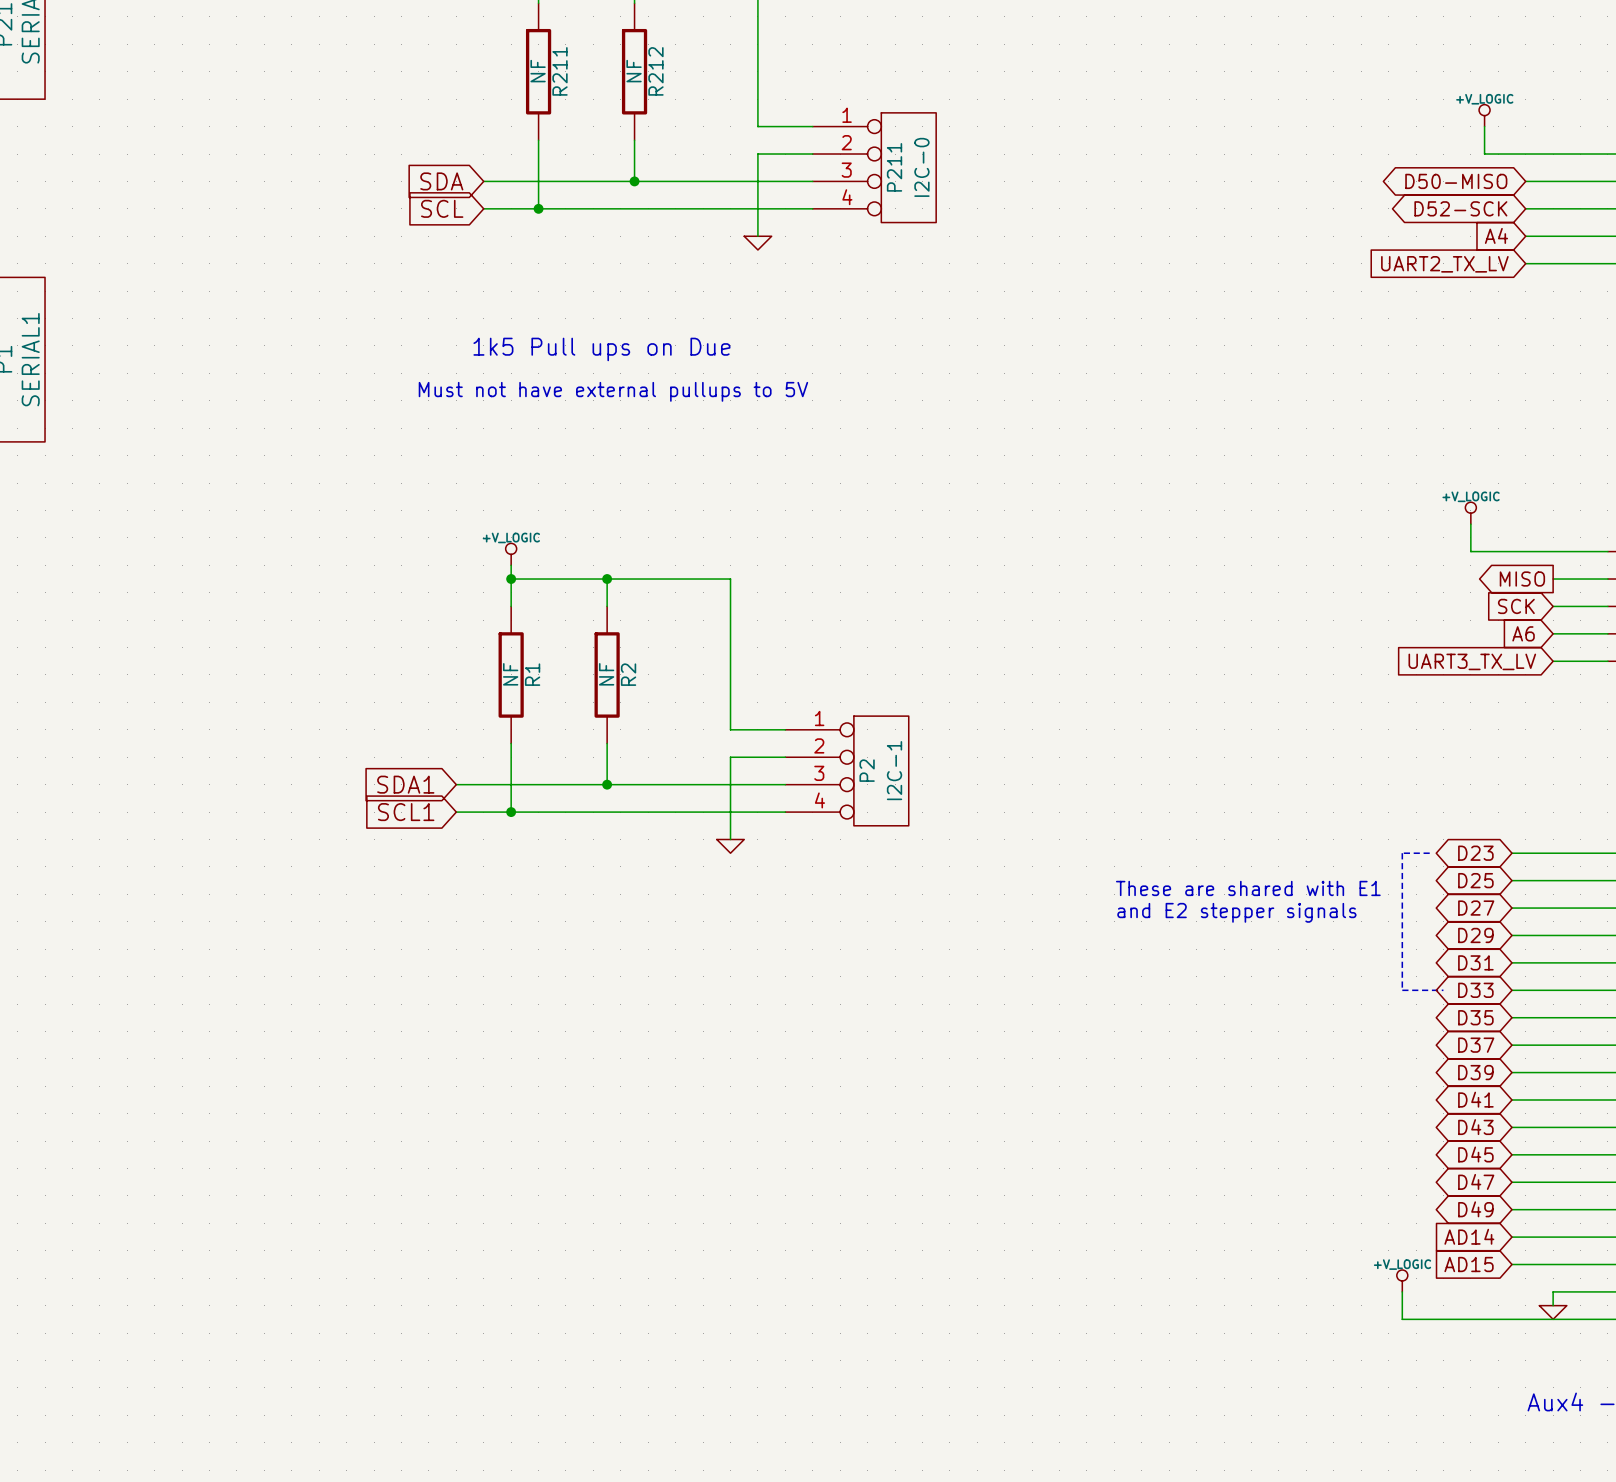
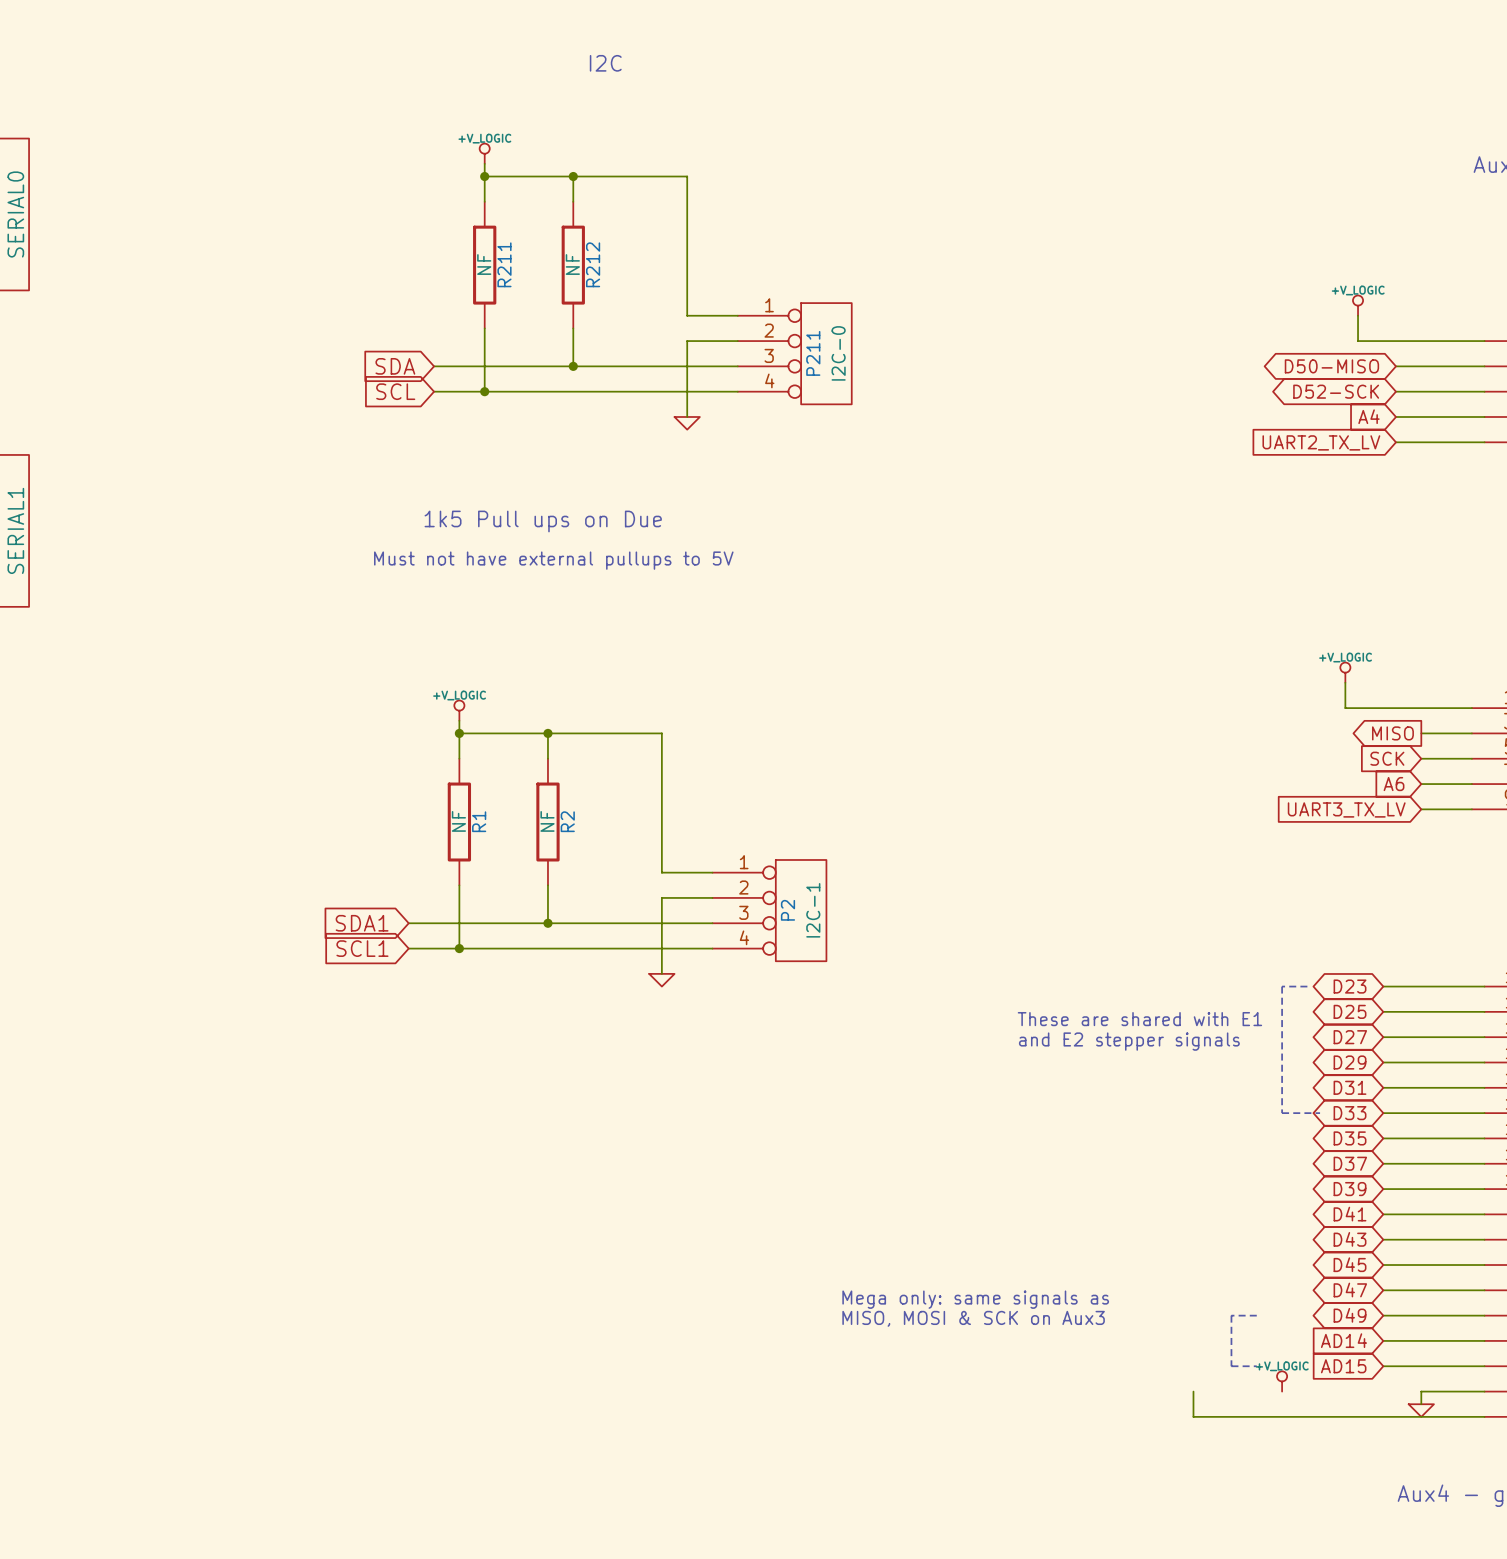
text: none -> Mega only: same signals as (975, 1299)
line: none -> (1256, 1315) (1231, 1315) (1231, 1366) (1256, 1366)
text: none -> MISO, MOSI & SCK on Aux3 (973, 1318)
wire: (1402, 1291) (1402, 1319) -> (1193, 1391) (1193, 1416) (1282, 1416)

